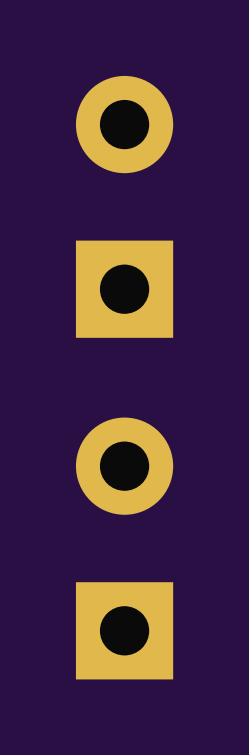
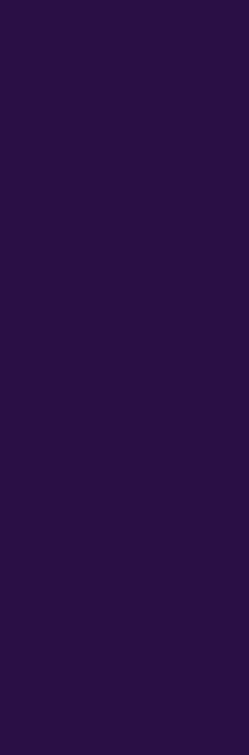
part: (124, 206) -> none
part: (124, 548) -> none

